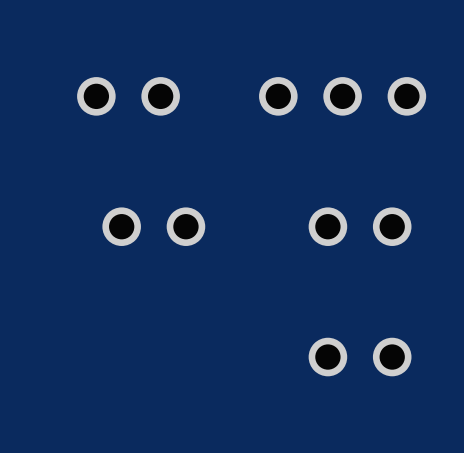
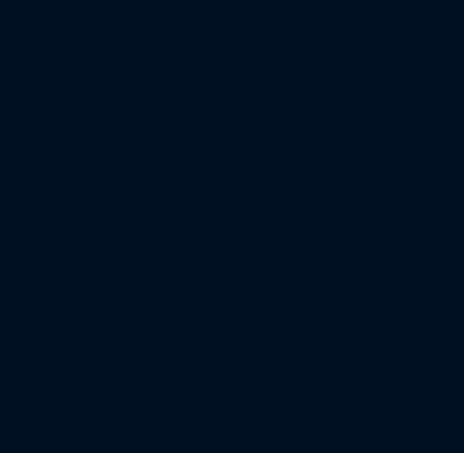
part: (128, 96) -> none
part: (342, 96) -> none
part: (153, 226) -> none
part: (360, 226) -> none
part: (360, 357) -> none

